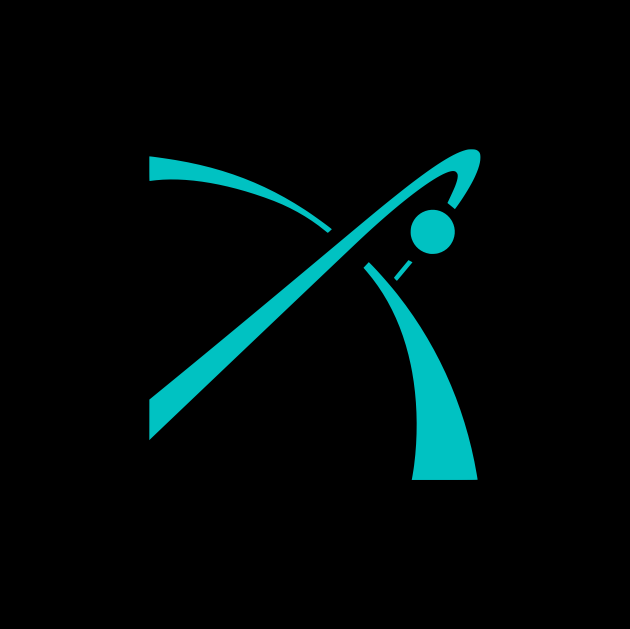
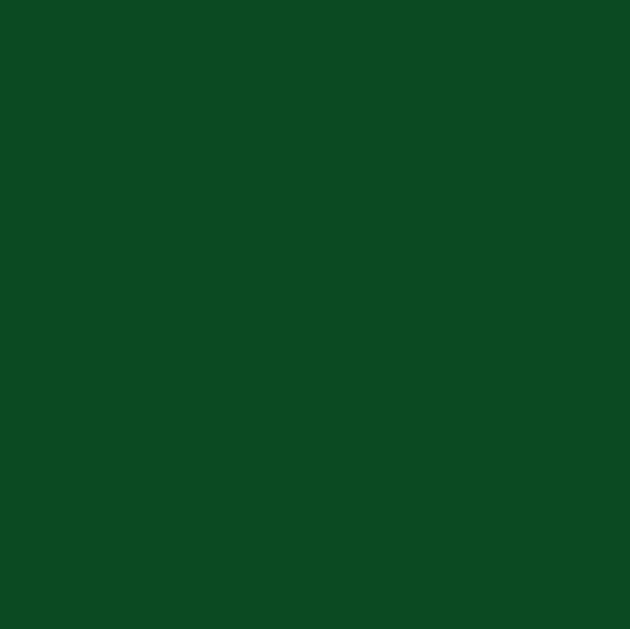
drawing: [149, 149, 481, 480] -> none

